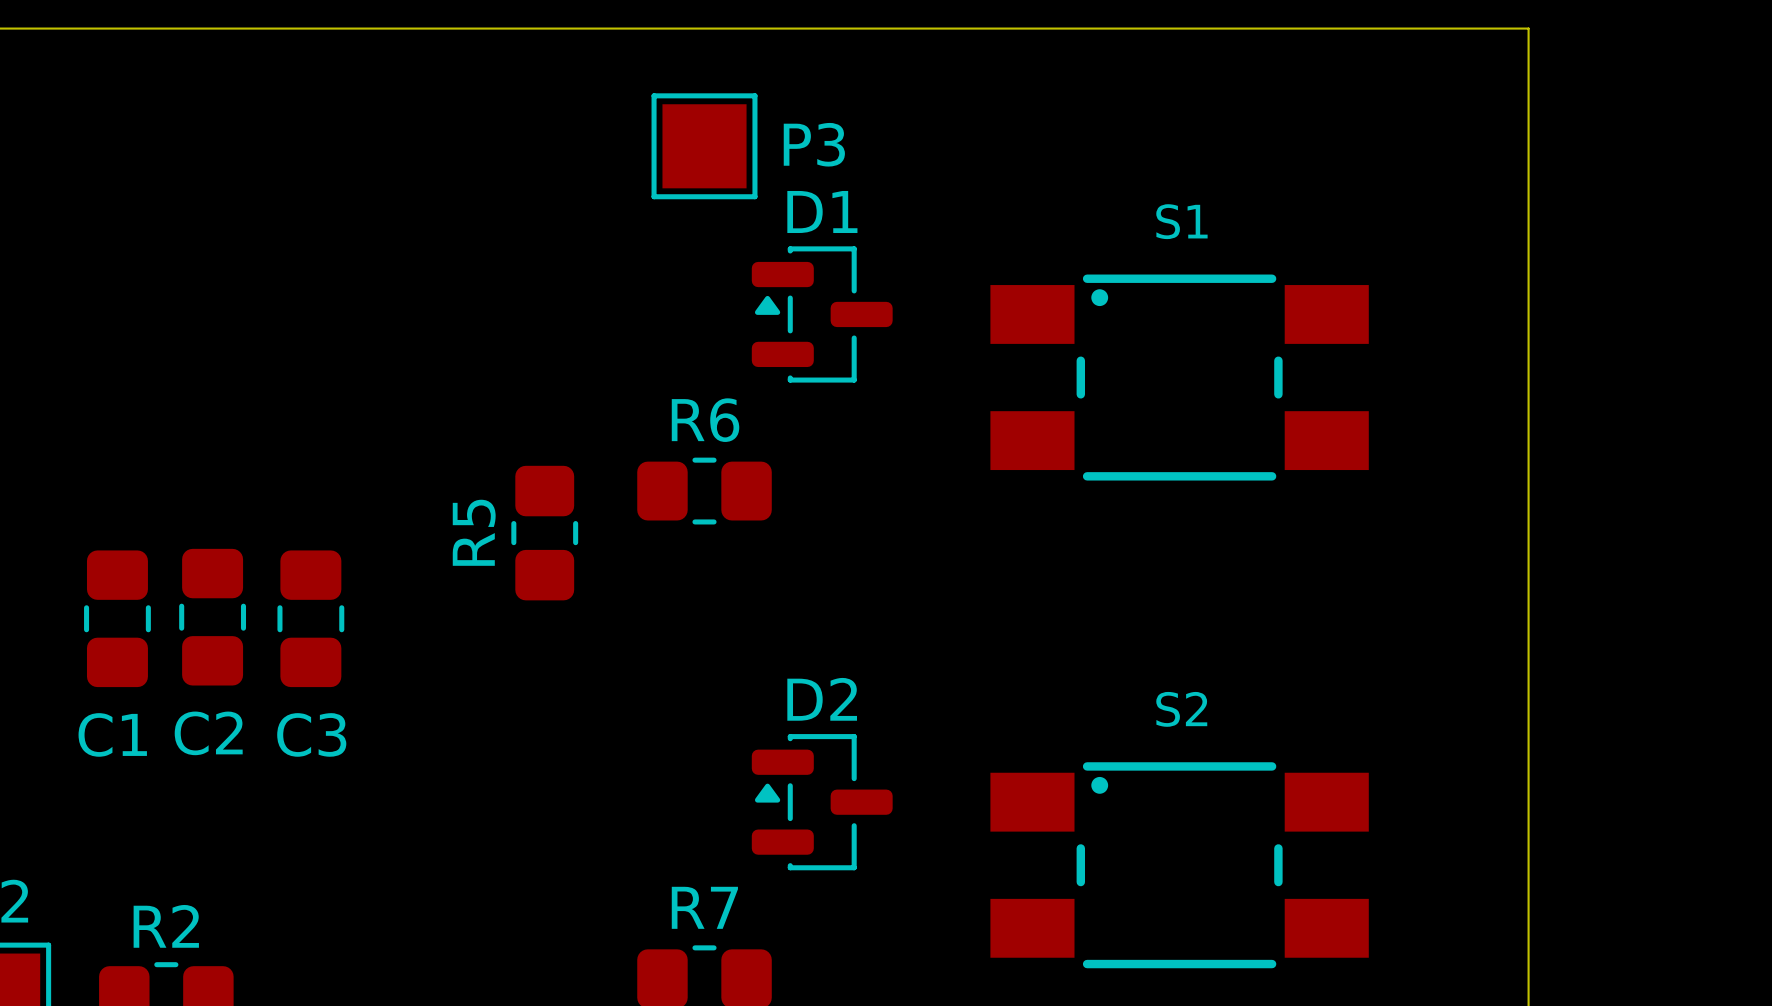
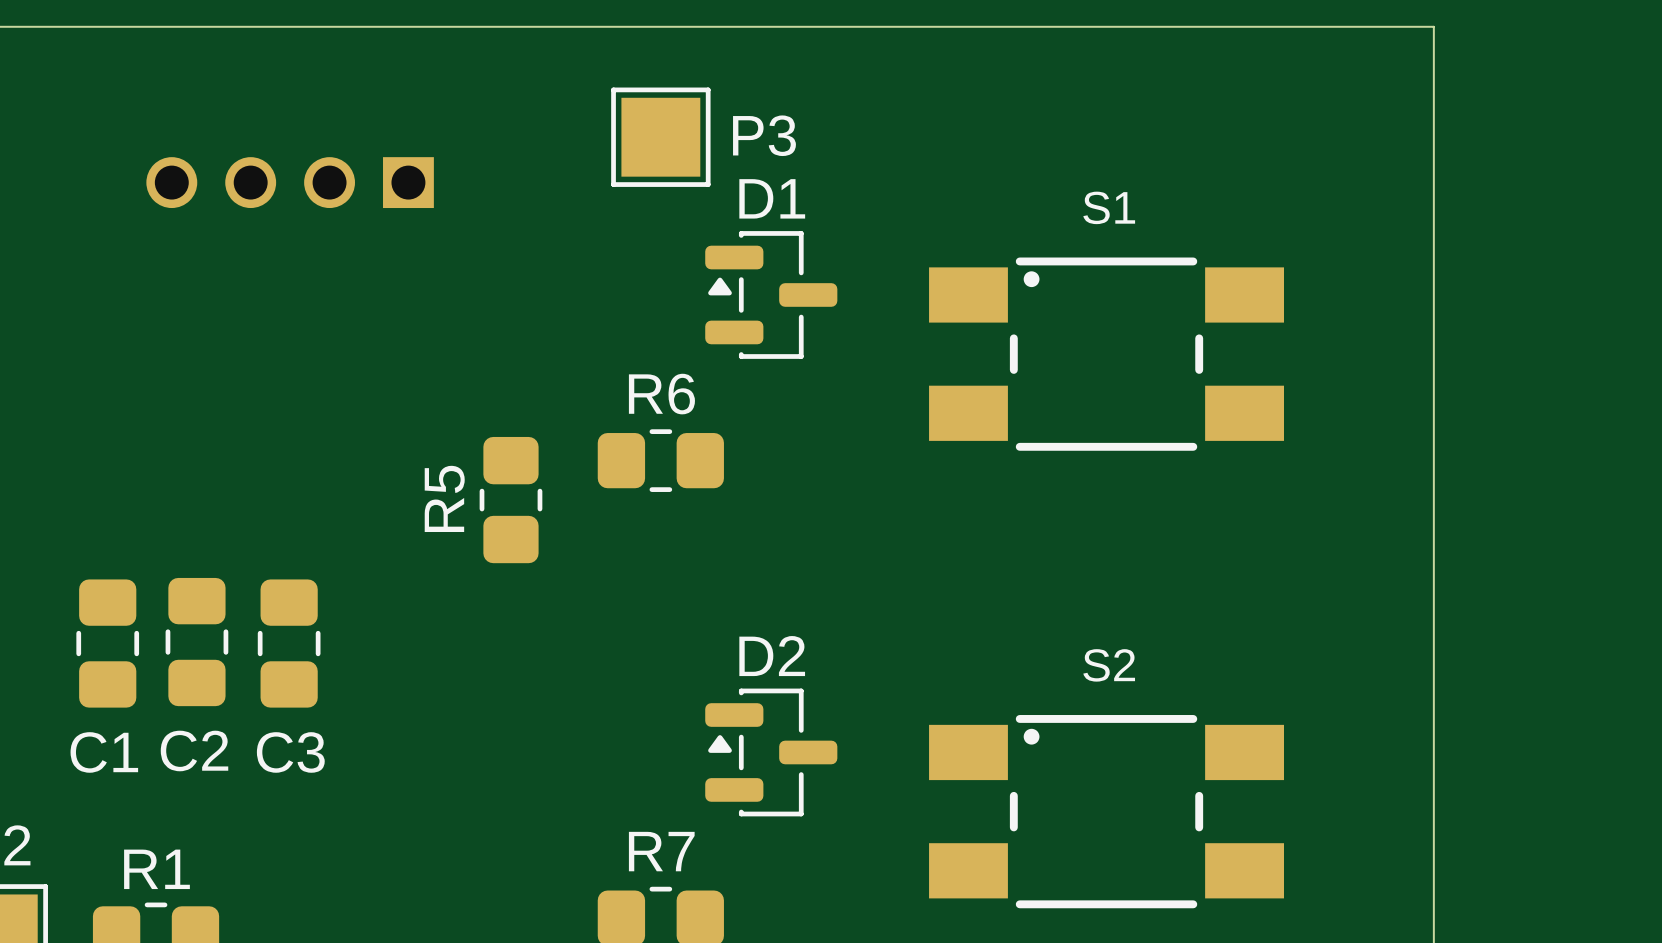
part: none -> (290, 182)
C2 position: (212, 617) -> (196, 642)
C1 position: (117, 618) -> (107, 643)
C3 position: (310, 618) -> (289, 643)
R2 name: R2 (166, 926) -> R1 (156, 869)

